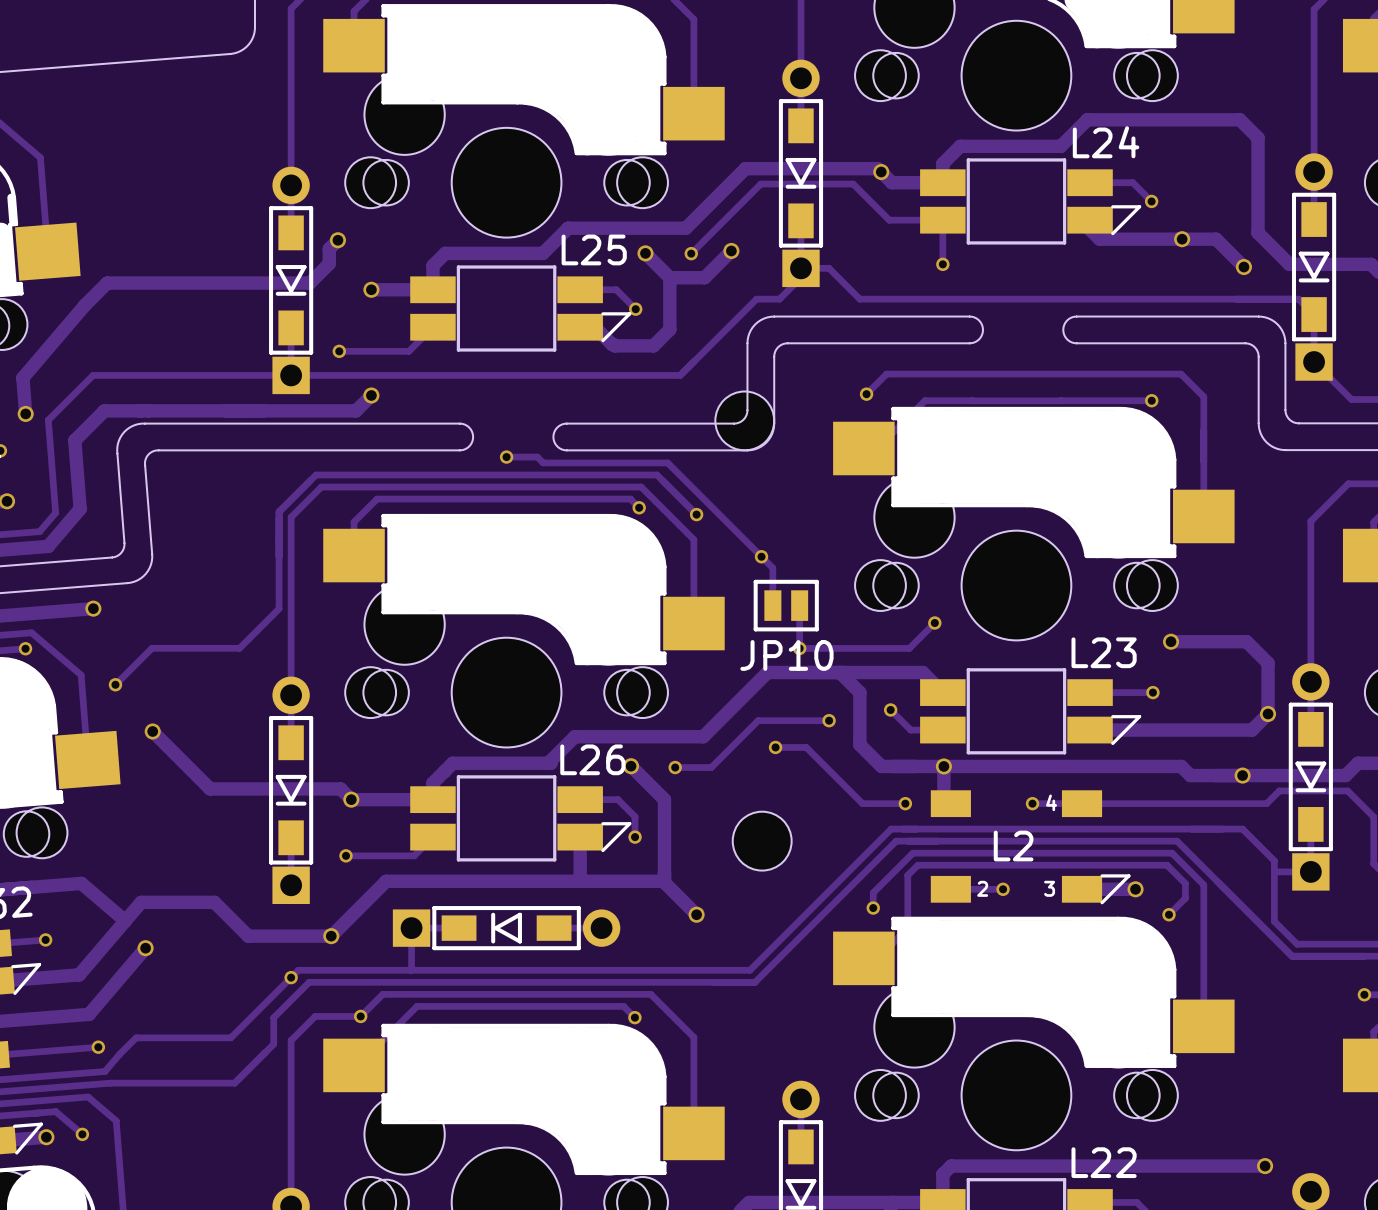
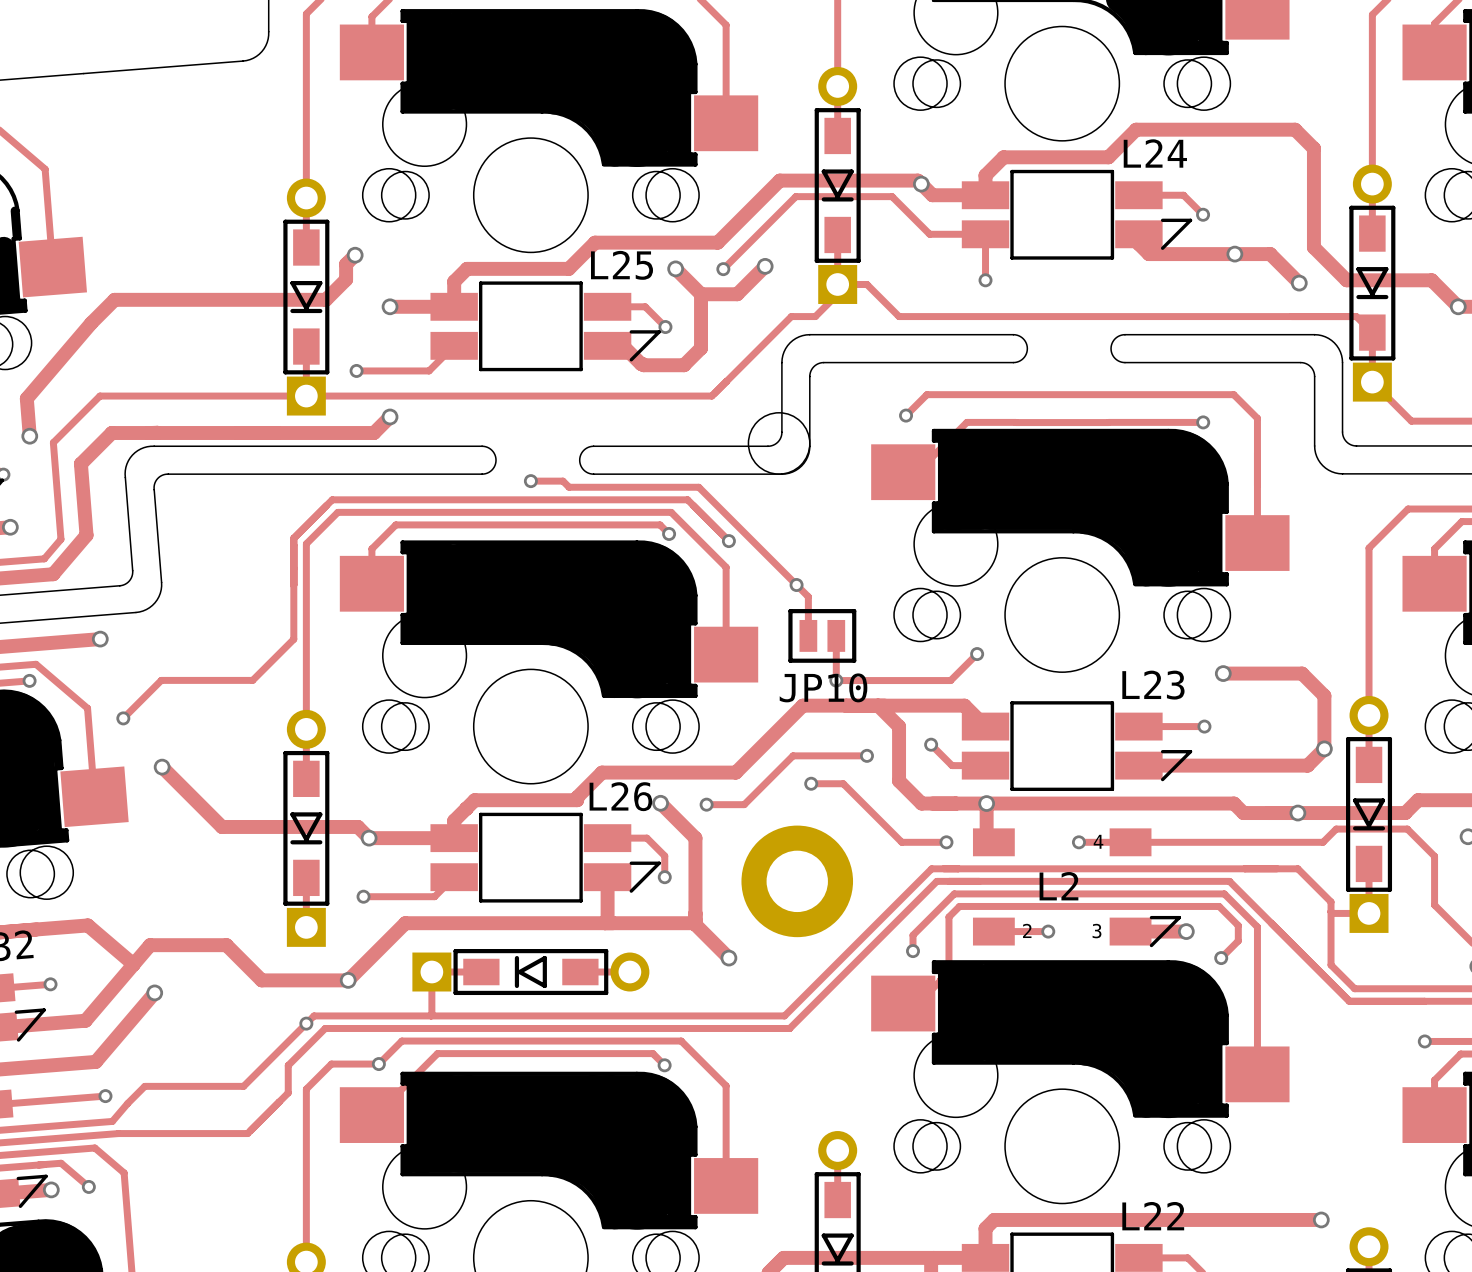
part footprint: [732, 811, 792, 871] -> [741, 825, 854, 938]

